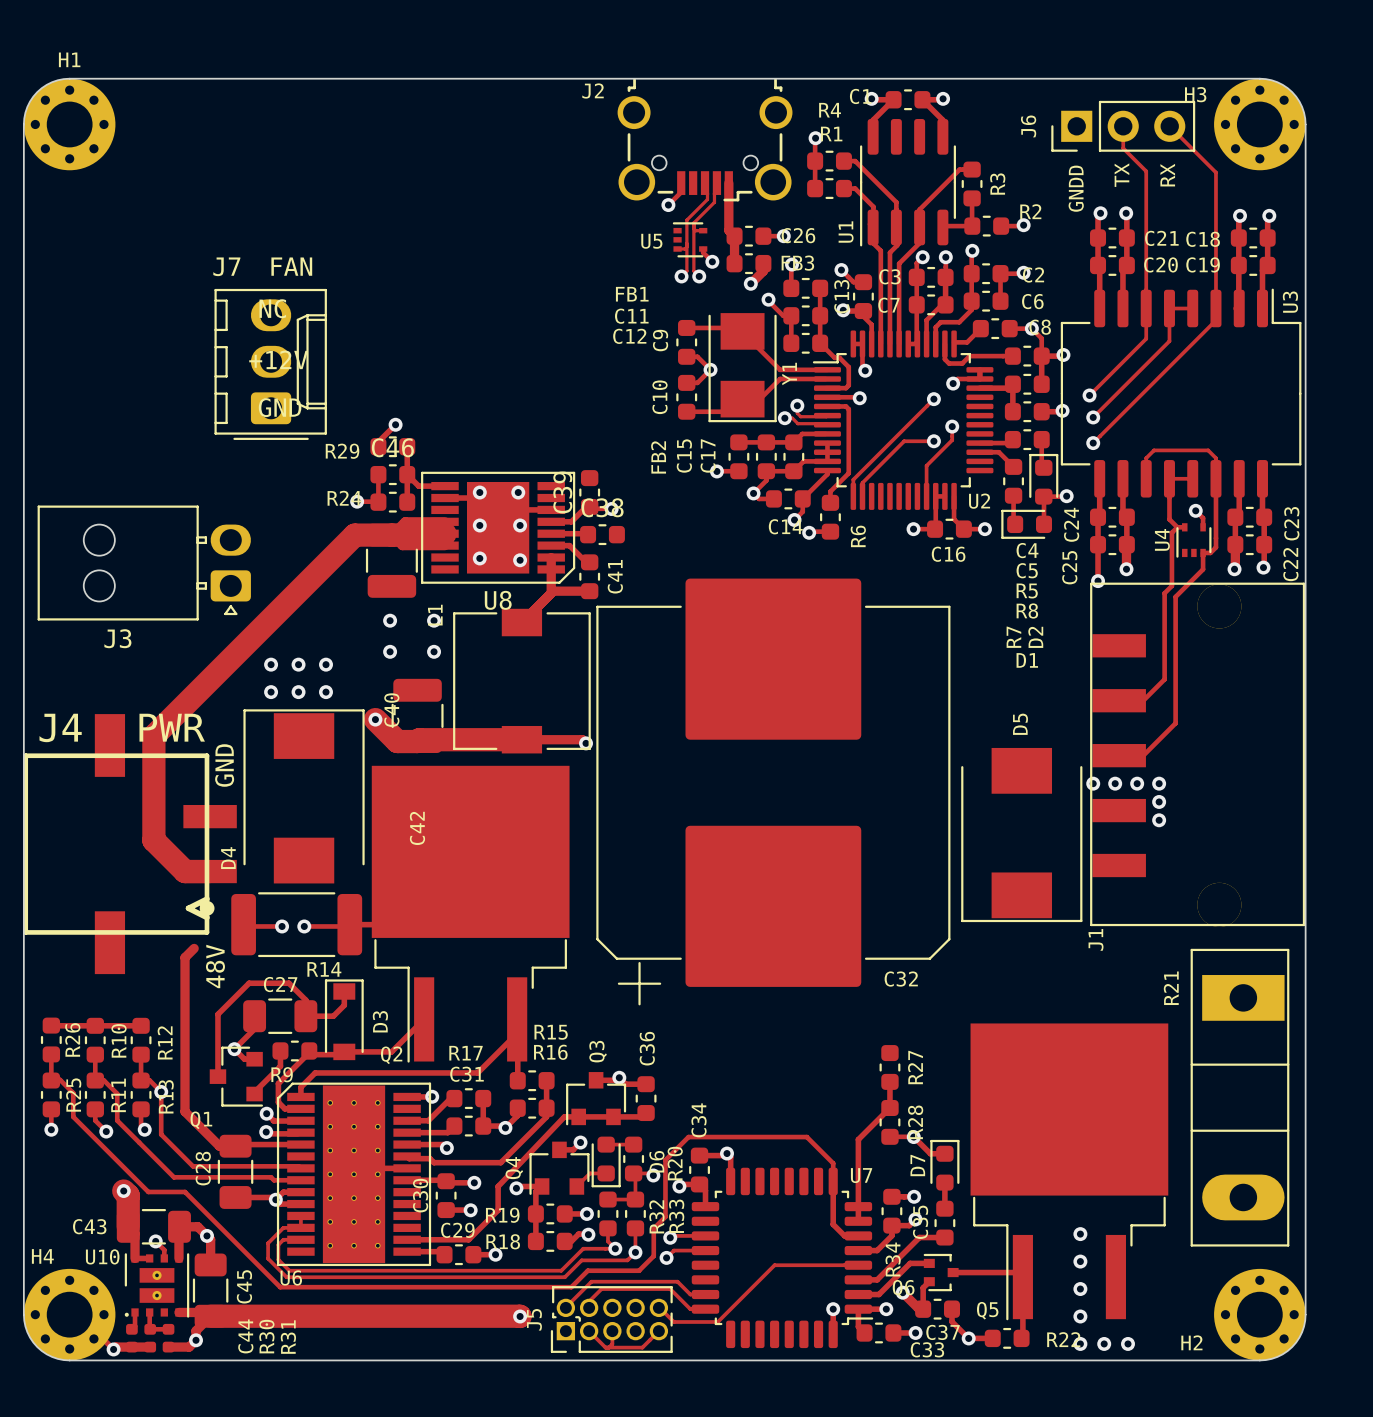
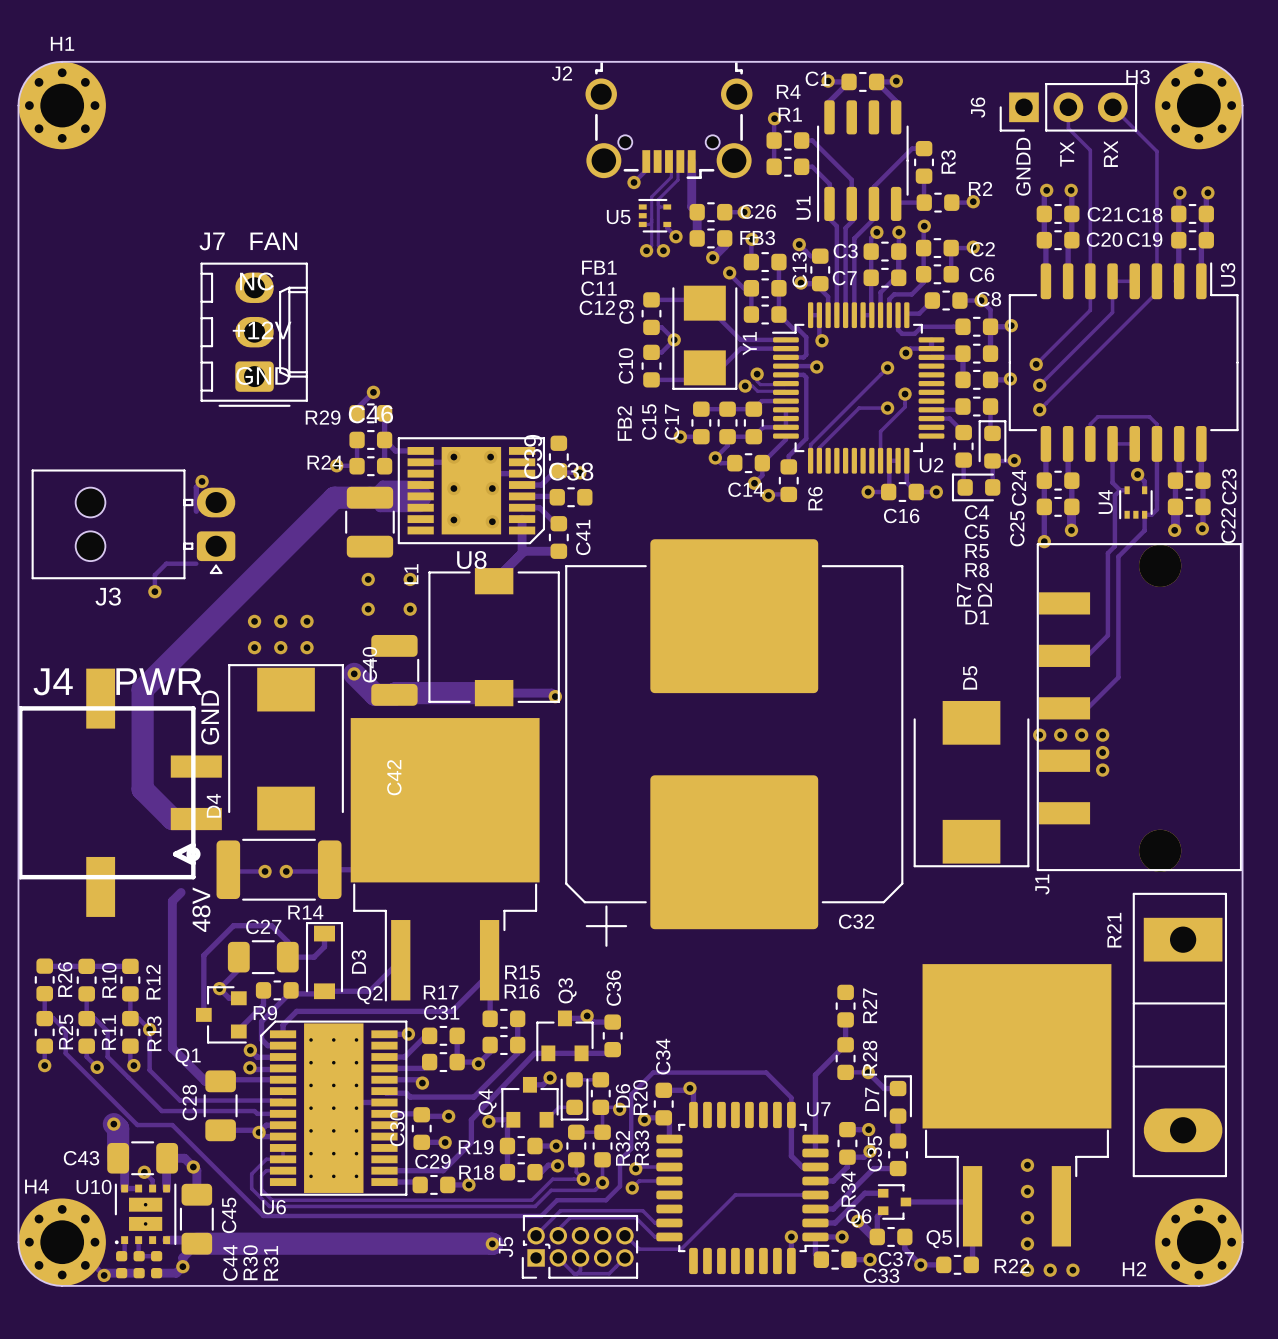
track: none -> (202, 481) (196, 487) (196, 511)
via: none -> (202, 481)
track: none -> (196, 563) (166, 563) (154, 575) (154, 591)
via: none -> (154, 591)

